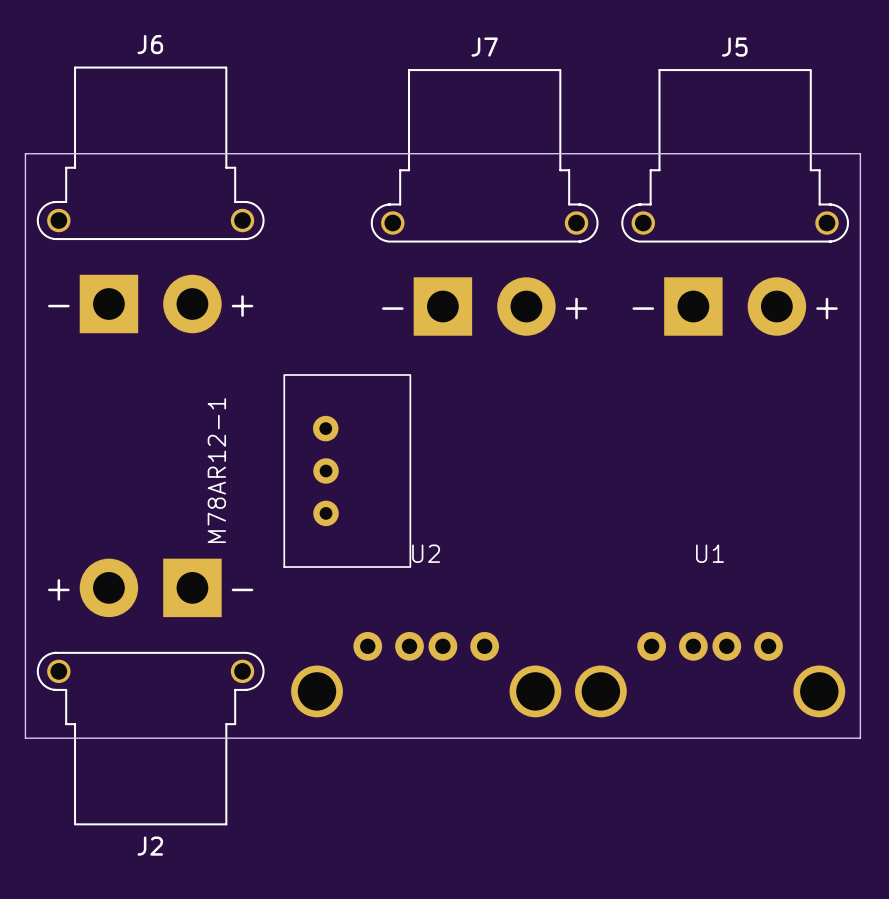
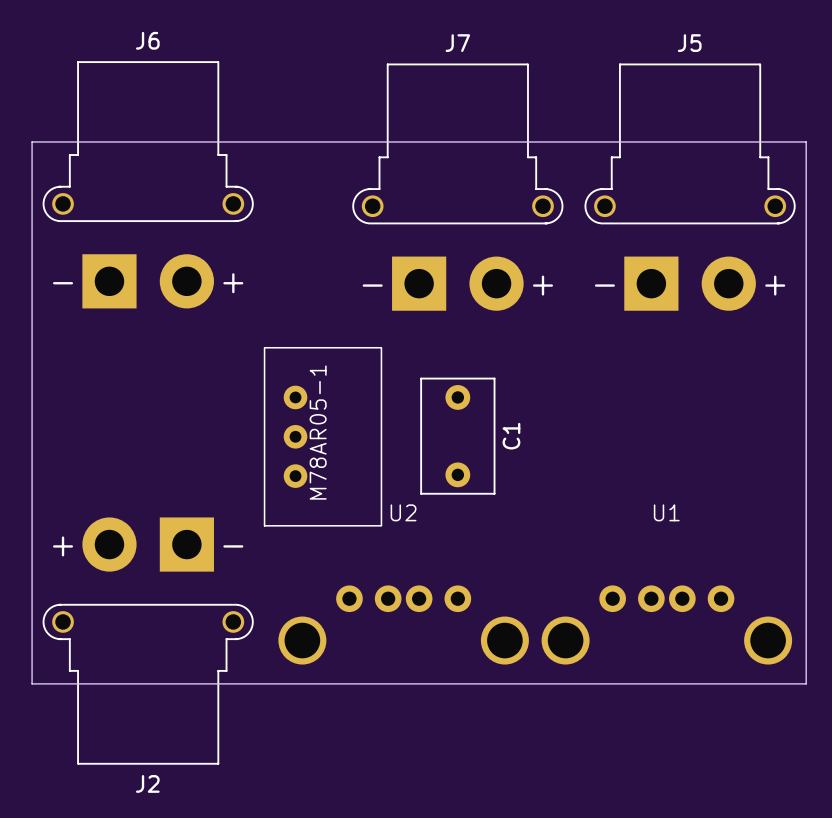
M78AR05-1: none -> (323, 436)
M78AR12-1: (347, 471) -> none
C1: none -> (457, 436)

